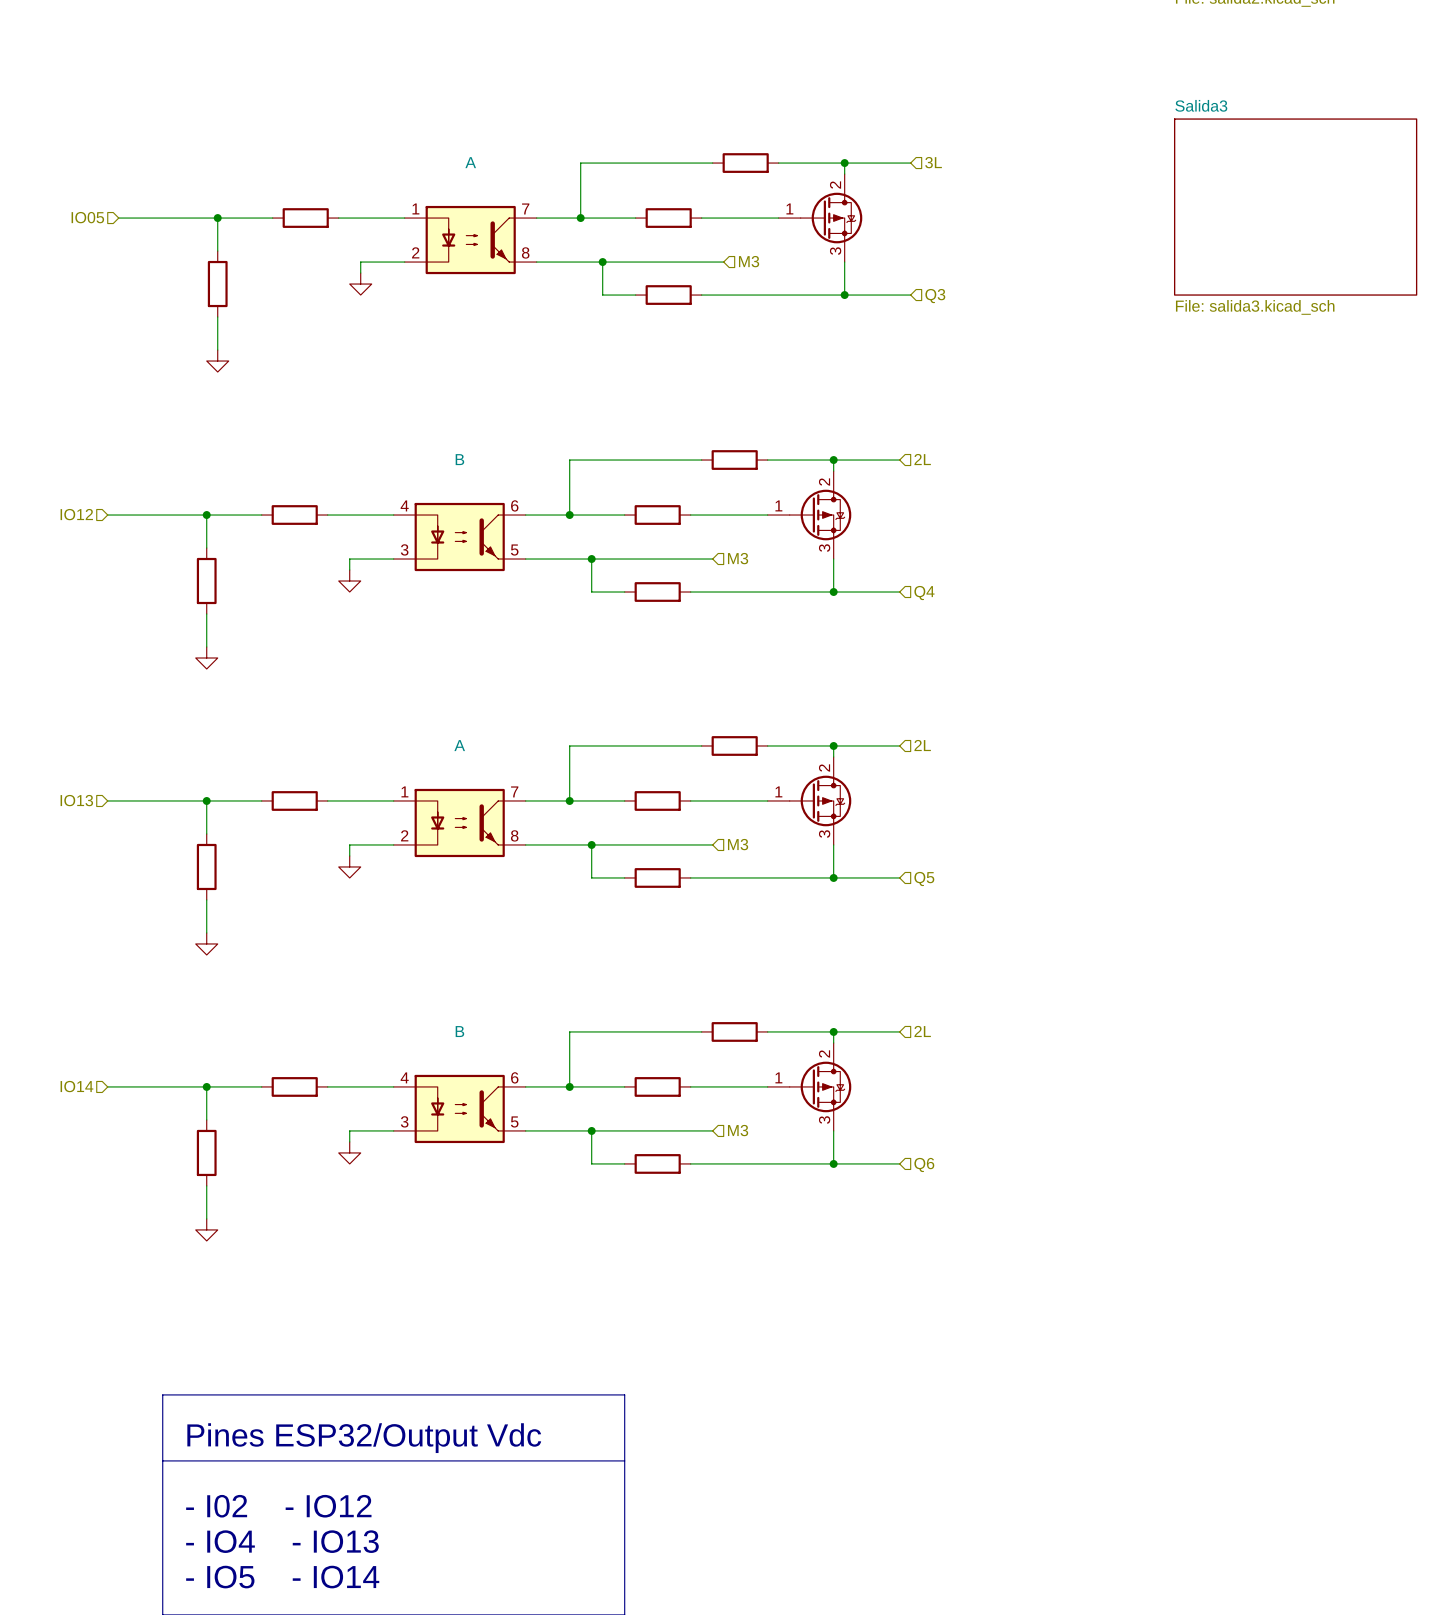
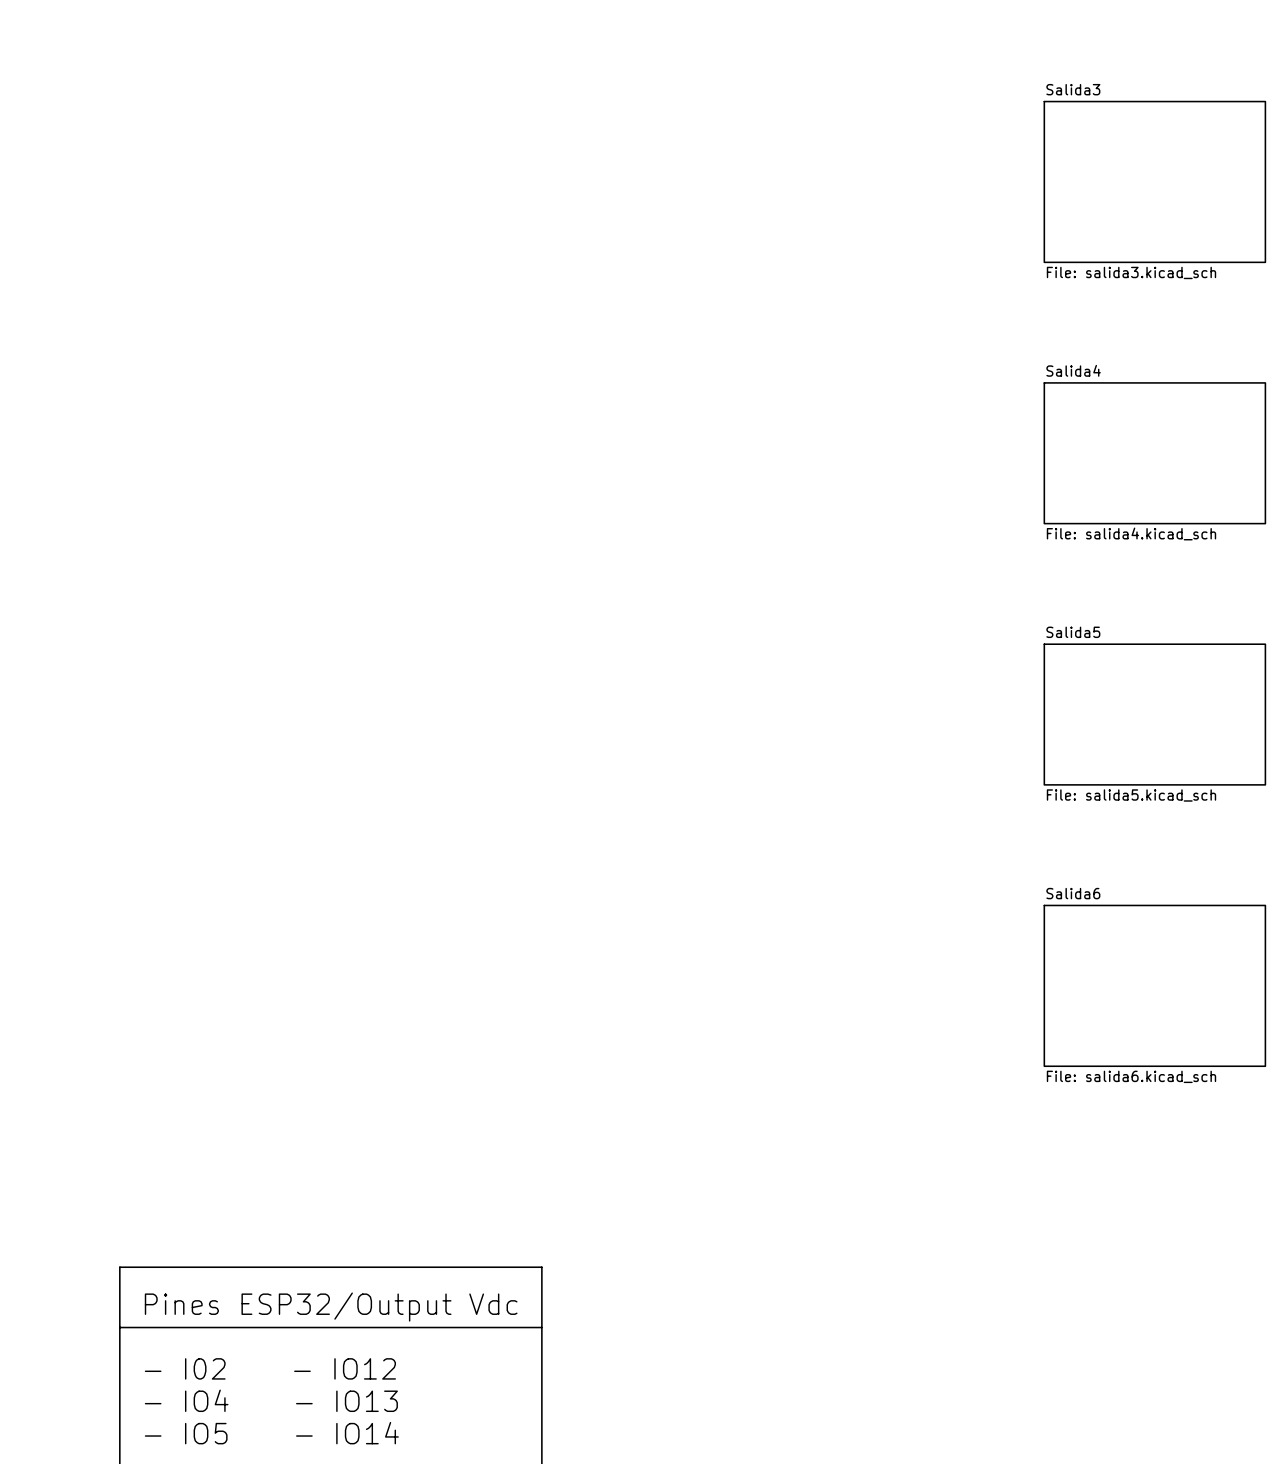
hierarchical label: 3L (933, 162) -> none
wire: (712, 163) (580, 163) (580, 218) -> none
part: (745, 163) -> none
wire: (778, 163) (910, 163) -> none
wire: (844, 163) (844, 174) -> none
junction: (844, 163) -> none
hierarchical label: IO05 (87, 217) -> none
wire: (118, 218) (272, 218) -> none
wire: (217, 218) (217, 251) -> none
junction: (217, 218) -> none
part: (305, 218) -> none
wire: (338, 218) (404, 218) -> none
wire: (536, 218) (635, 218) -> none
junction: (580, 218) -> none
part: (668, 218) -> none
wire: (701, 218) (778, 218) -> none
part: (820, 218) -> none
A: (470, 240) -> none
hierarchical label: M3 (749, 261) -> none
wire: (404, 262) (360, 262) (360, 273) -> none
wire: (536, 262) (723, 262) -> none
wire: (602, 262) (602, 295) (635, 295) -> none
junction: (602, 262) -> none
wire: (844, 262) (844, 295) -> none
part: (217, 284) -> none
power symbol: (360, 284) -> none
part: (668, 295) -> none
wire: (701, 295) (910, 295) -> none
junction: (844, 295) -> none
hierarchical label: Q3 (935, 296) -> none
wire: (217, 317) (217, 350) -> none
power symbol: (217, 361) -> none
hierarchical label: 2L (922, 459) -> none
wire: (701, 460) (569, 460) (569, 515) -> none
part: (734, 460) -> none
wire: (767, 460) (899, 460) -> none
wire: (833, 460) (833, 471) -> none
junction: (833, 460) -> none
sheet Salida4: none -> File: salida4.kicad_sch (1154, 453)
hierarchical label: IO12 (76, 514) -> none
wire: (107, 515) (261, 515) -> none
wire: (206, 515) (206, 548) -> none
junction: (206, 515) -> none
part: (294, 515) -> none
wire: (327, 515) (393, 515) -> none
wire: (525, 515) (624, 515) -> none
junction: (569, 515) -> none
part: (657, 515) -> none
wire: (690, 515) (767, 515) -> none
part: (809, 515) -> none
B: (459, 537) -> none
hierarchical label: M3 (738, 558) -> none
wire: (393, 559) (349, 559) (349, 570) -> none
wire: (525, 559) (712, 559) -> none
wire: (591, 559) (591, 592) (624, 592) -> none
junction: (591, 559) -> none
wire: (833, 559) (833, 592) -> none
part: (206, 581) -> none
power symbol: (349, 581) -> none
part: (657, 592) -> none
wire: (690, 592) (899, 592) -> none
junction: (833, 592) -> none
hierarchical label: Q4 (924, 593) -> none
wire: (206, 614) (206, 647) -> none
power symbol: (206, 658) -> none
wire: (701, 745) (569, 745) (569, 800) -> none
part: (734, 745) -> none
wire: (767, 745) (899, 745) -> none
wire: (833, 745) (833, 756) -> none
junction: (833, 745) -> none
hierarchical label: 2L (922, 745) -> none
sheet Salida5: none -> File: salida5.kicad_sch (1154, 714)
hierarchical label: IO13 (76, 800) -> none
wire: (107, 800) (261, 800) -> none
wire: (206, 800) (206, 833) -> none
junction: (206, 800) -> none
part: (294, 800) -> none
wire: (327, 800) (393, 800) -> none
wire: (525, 800) (624, 800) -> none
junction: (569, 800) -> none
part: (657, 800) -> none
wire: (690, 800) (767, 800) -> none
part: (809, 800) -> none
A: (459, 822) -> none
wire: (393, 844) (349, 844) (349, 855) -> none
wire: (525, 844) (712, 844) -> none
wire: (591, 844) (591, 877) (624, 877) -> none
junction: (591, 844) -> none
hierarchical label: M3 (738, 844) -> none
wire: (833, 844) (833, 877) -> none
part: (206, 866) -> none
power symbol: (349, 866) -> none
part: (657, 877) -> none
wire: (690, 877) (899, 877) -> none
junction: (833, 877) -> none
hierarchical label: Q5 (924, 879) -> none
wire: (206, 899) (206, 932) -> none
power symbol: (206, 943) -> none
wire: (701, 1031) (569, 1031) (569, 1086) -> none
part: (734, 1031) -> none
wire: (767, 1031) (899, 1031) -> none
wire: (833, 1031) (833, 1042) -> none
junction: (833, 1031) -> none
hierarchical label: 2L (922, 1031) -> none
hierarchical label: IO14 (76, 1086) -> none
wire: (107, 1086) (261, 1086) -> none
wire: (206, 1086) (206, 1119) -> none
junction: (206, 1086) -> none
part: (294, 1086) -> none
wire: (327, 1086) (393, 1086) -> none
wire: (525, 1086) (624, 1086) -> none
junction: (569, 1086) -> none
part: (657, 1086) -> none
wire: (690, 1086) (767, 1086) -> none
part: (809, 1086) -> none
sheet Salida6: none -> File: salida6.kicad_sch (1154, 985)
B: (459, 1108) -> none
wire: (393, 1130) (349, 1130) (349, 1141) -> none
wire: (525, 1130) (712, 1130) -> none
wire: (591, 1130) (591, 1163) (624, 1163) -> none
junction: (591, 1130) -> none
hierarchical label: M3 (738, 1130) -> none
wire: (833, 1130) (833, 1163) -> none
part: (206, 1152) -> none
power symbol: (349, 1152) -> none
part: (657, 1163) -> none
wire: (690, 1163) (899, 1163) -> none
junction: (833, 1163) -> none
hierarchical label: Q6 (924, 1164) -> none
wire: (206, 1185) (206, 1218) -> none
power symbol: (206, 1229) -> none

